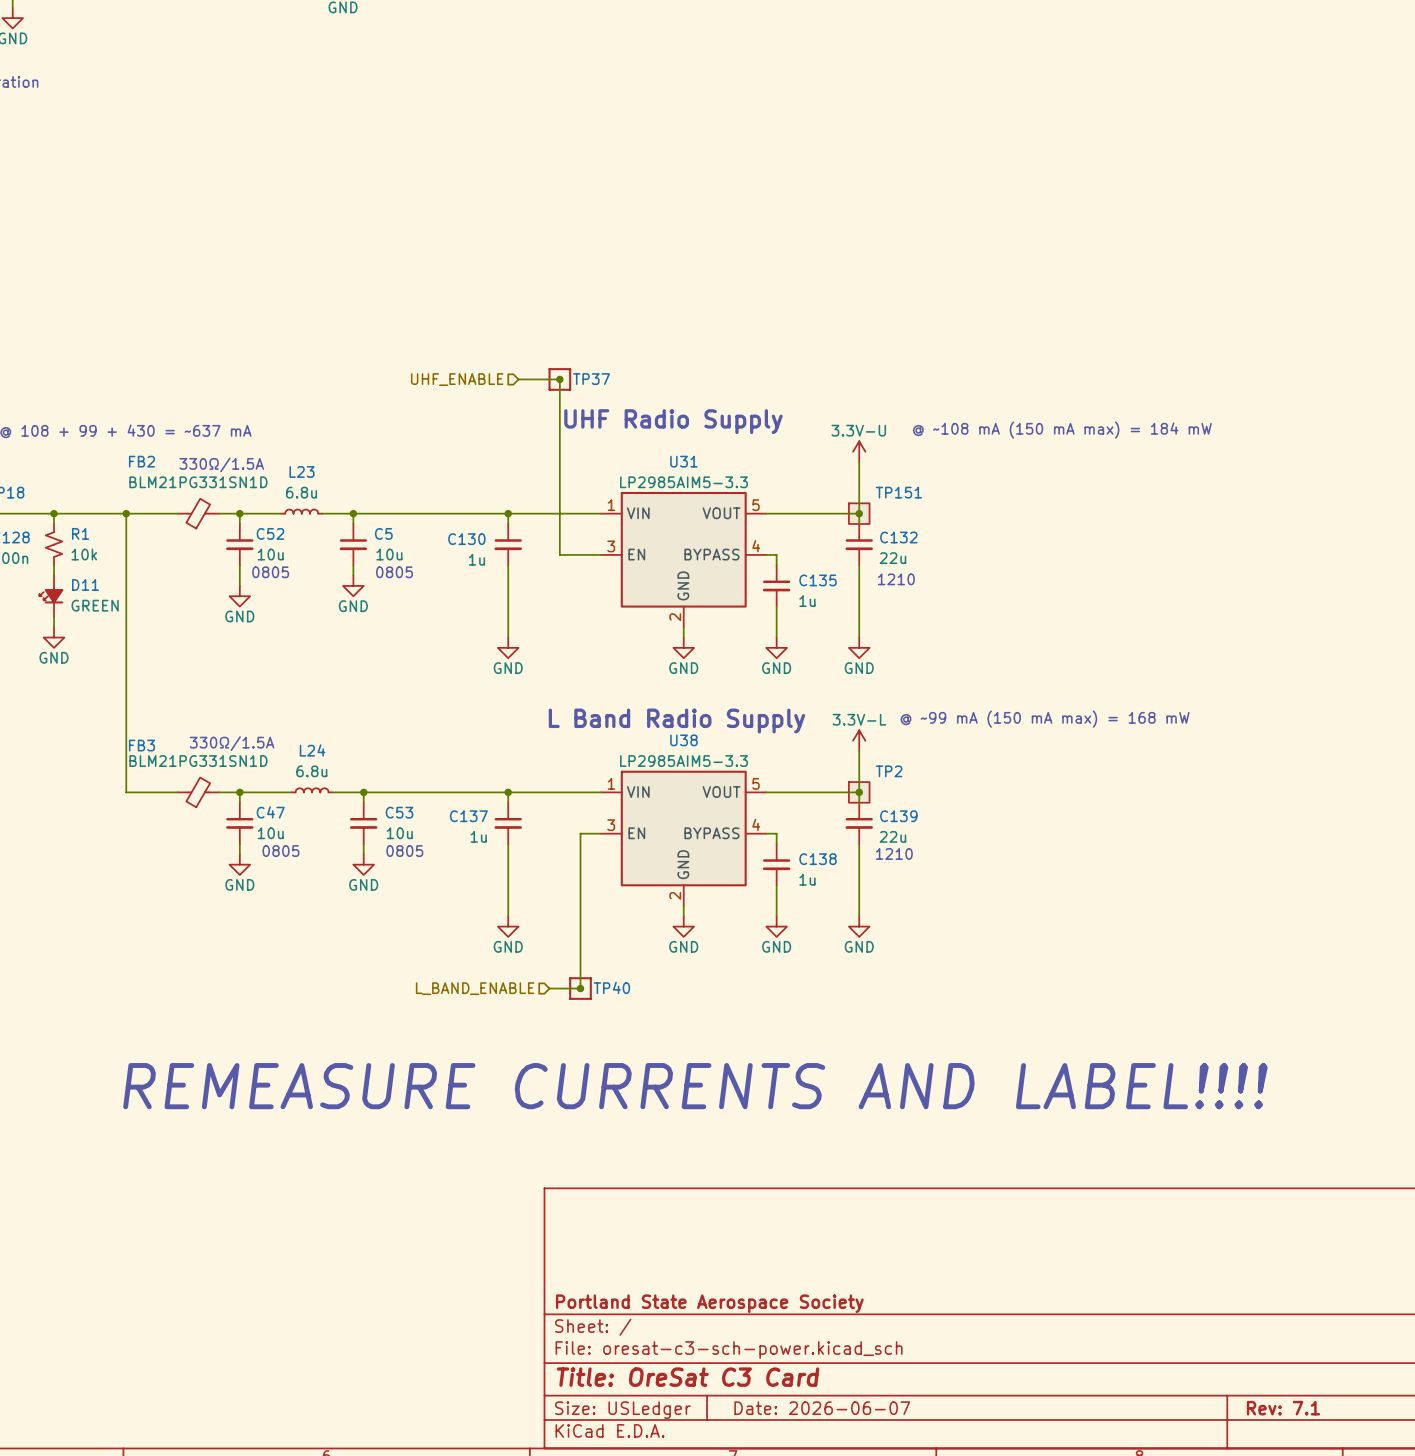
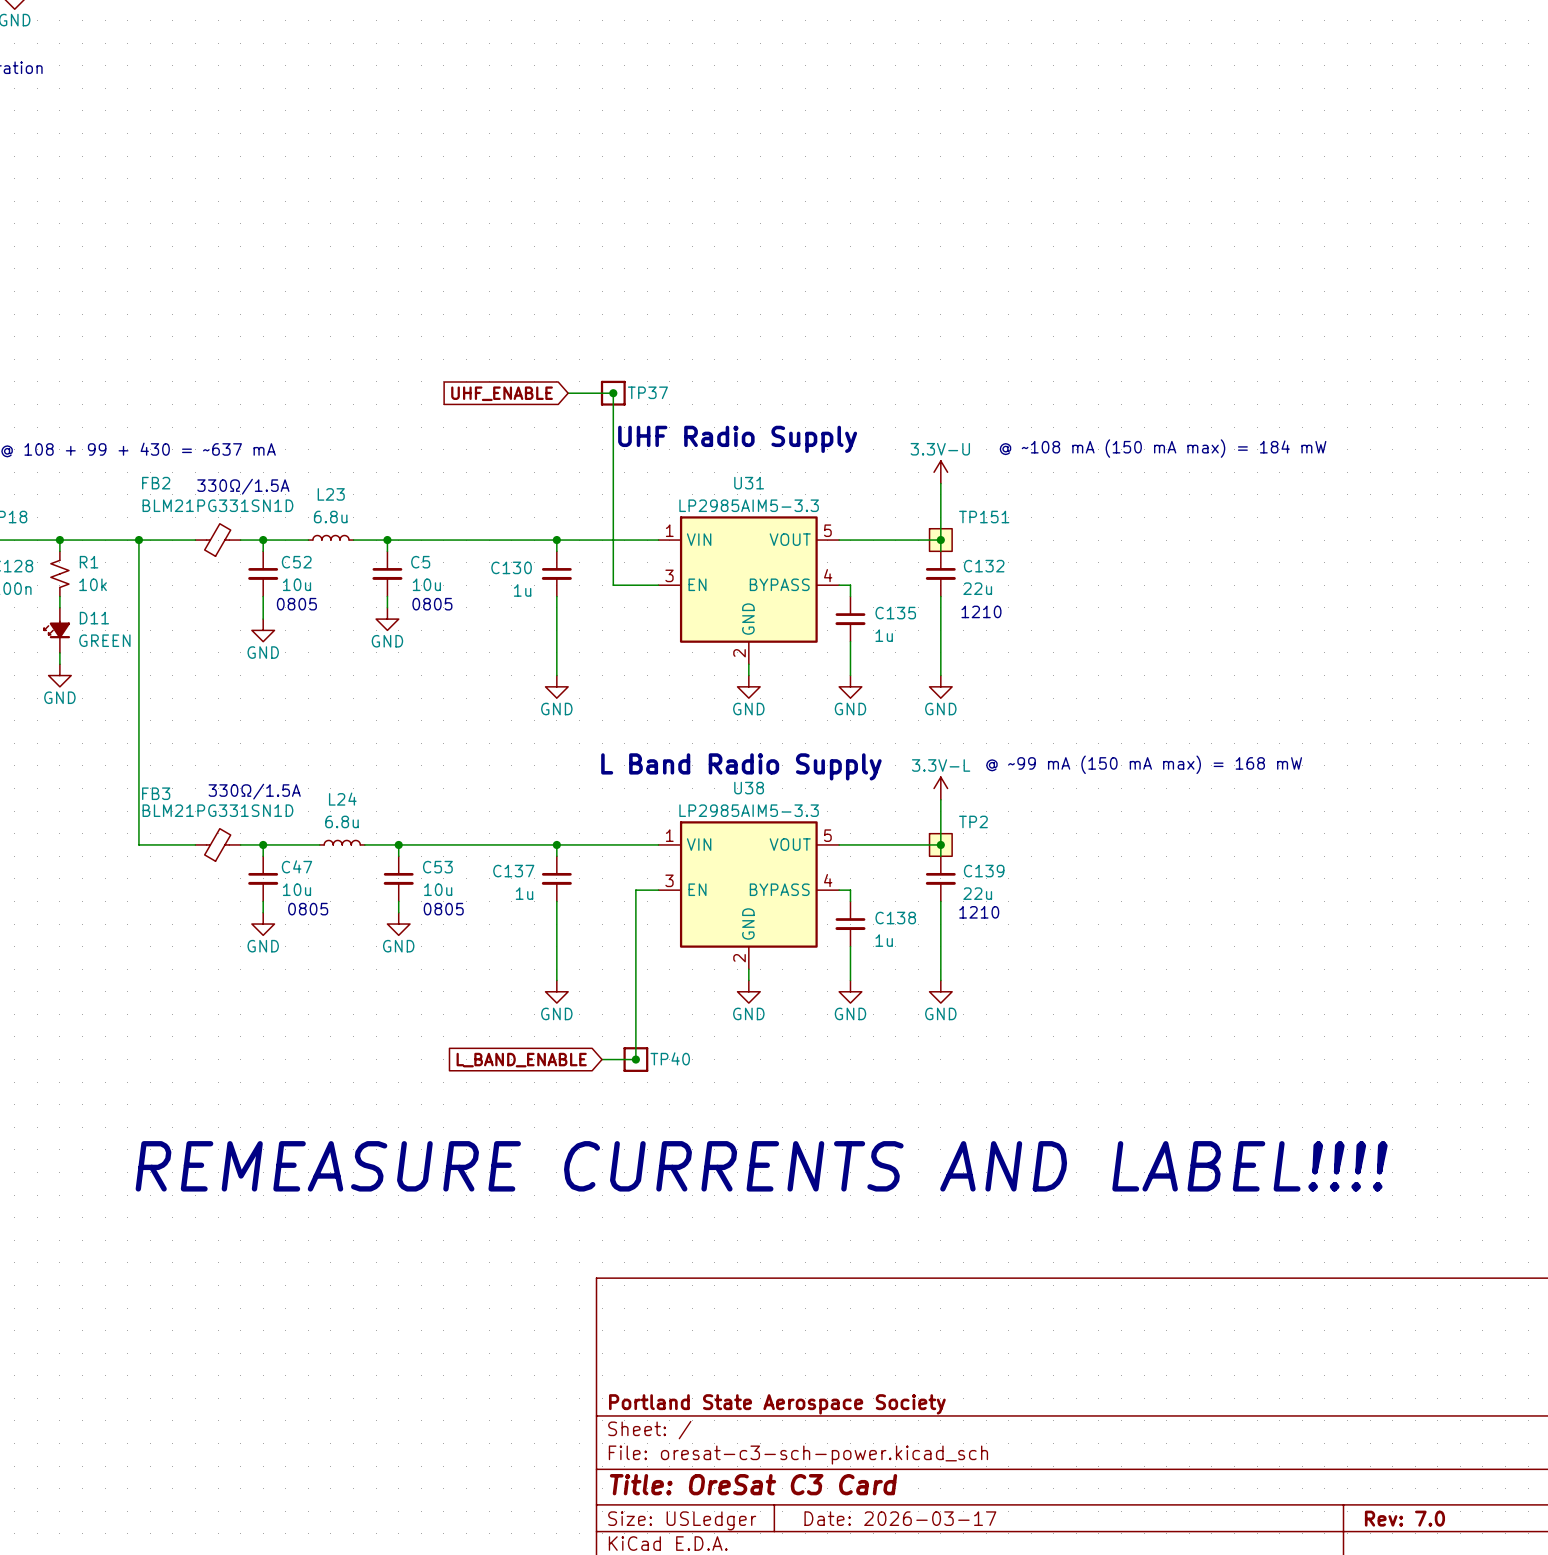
hierarchical label: UHF_ENABLE (457, 379) -> none
global label: none -> UHF_ENABLE (502, 393)
hierarchical label: L_BAND_ENABLE (475, 988) -> none
global label: none -> L_BAND_ENABLE (521, 1060)
title block: Date: 2026-06-07 (822, 1408) -> Date: 2026-03-17 (900, 1518)
title block: Rev: 7.1 (1283, 1408) -> Rev: 7.0 (1404, 1518)

